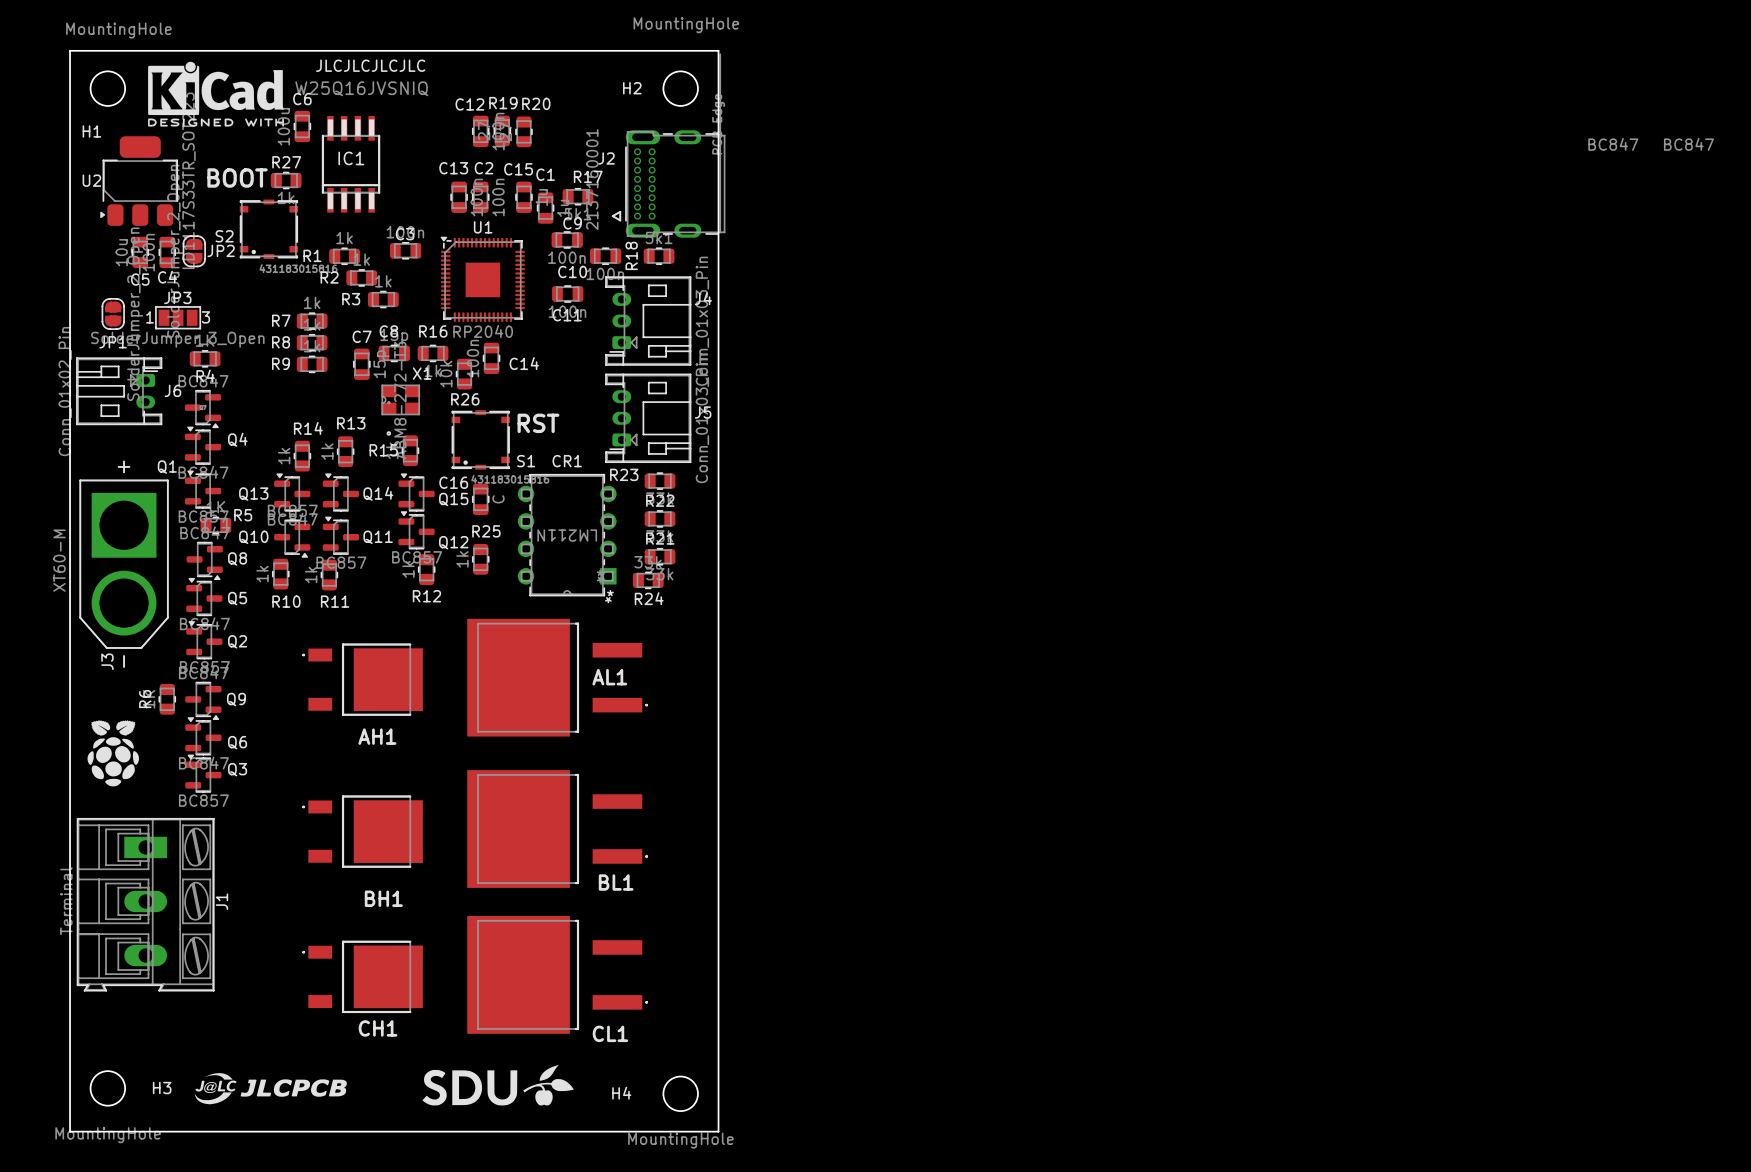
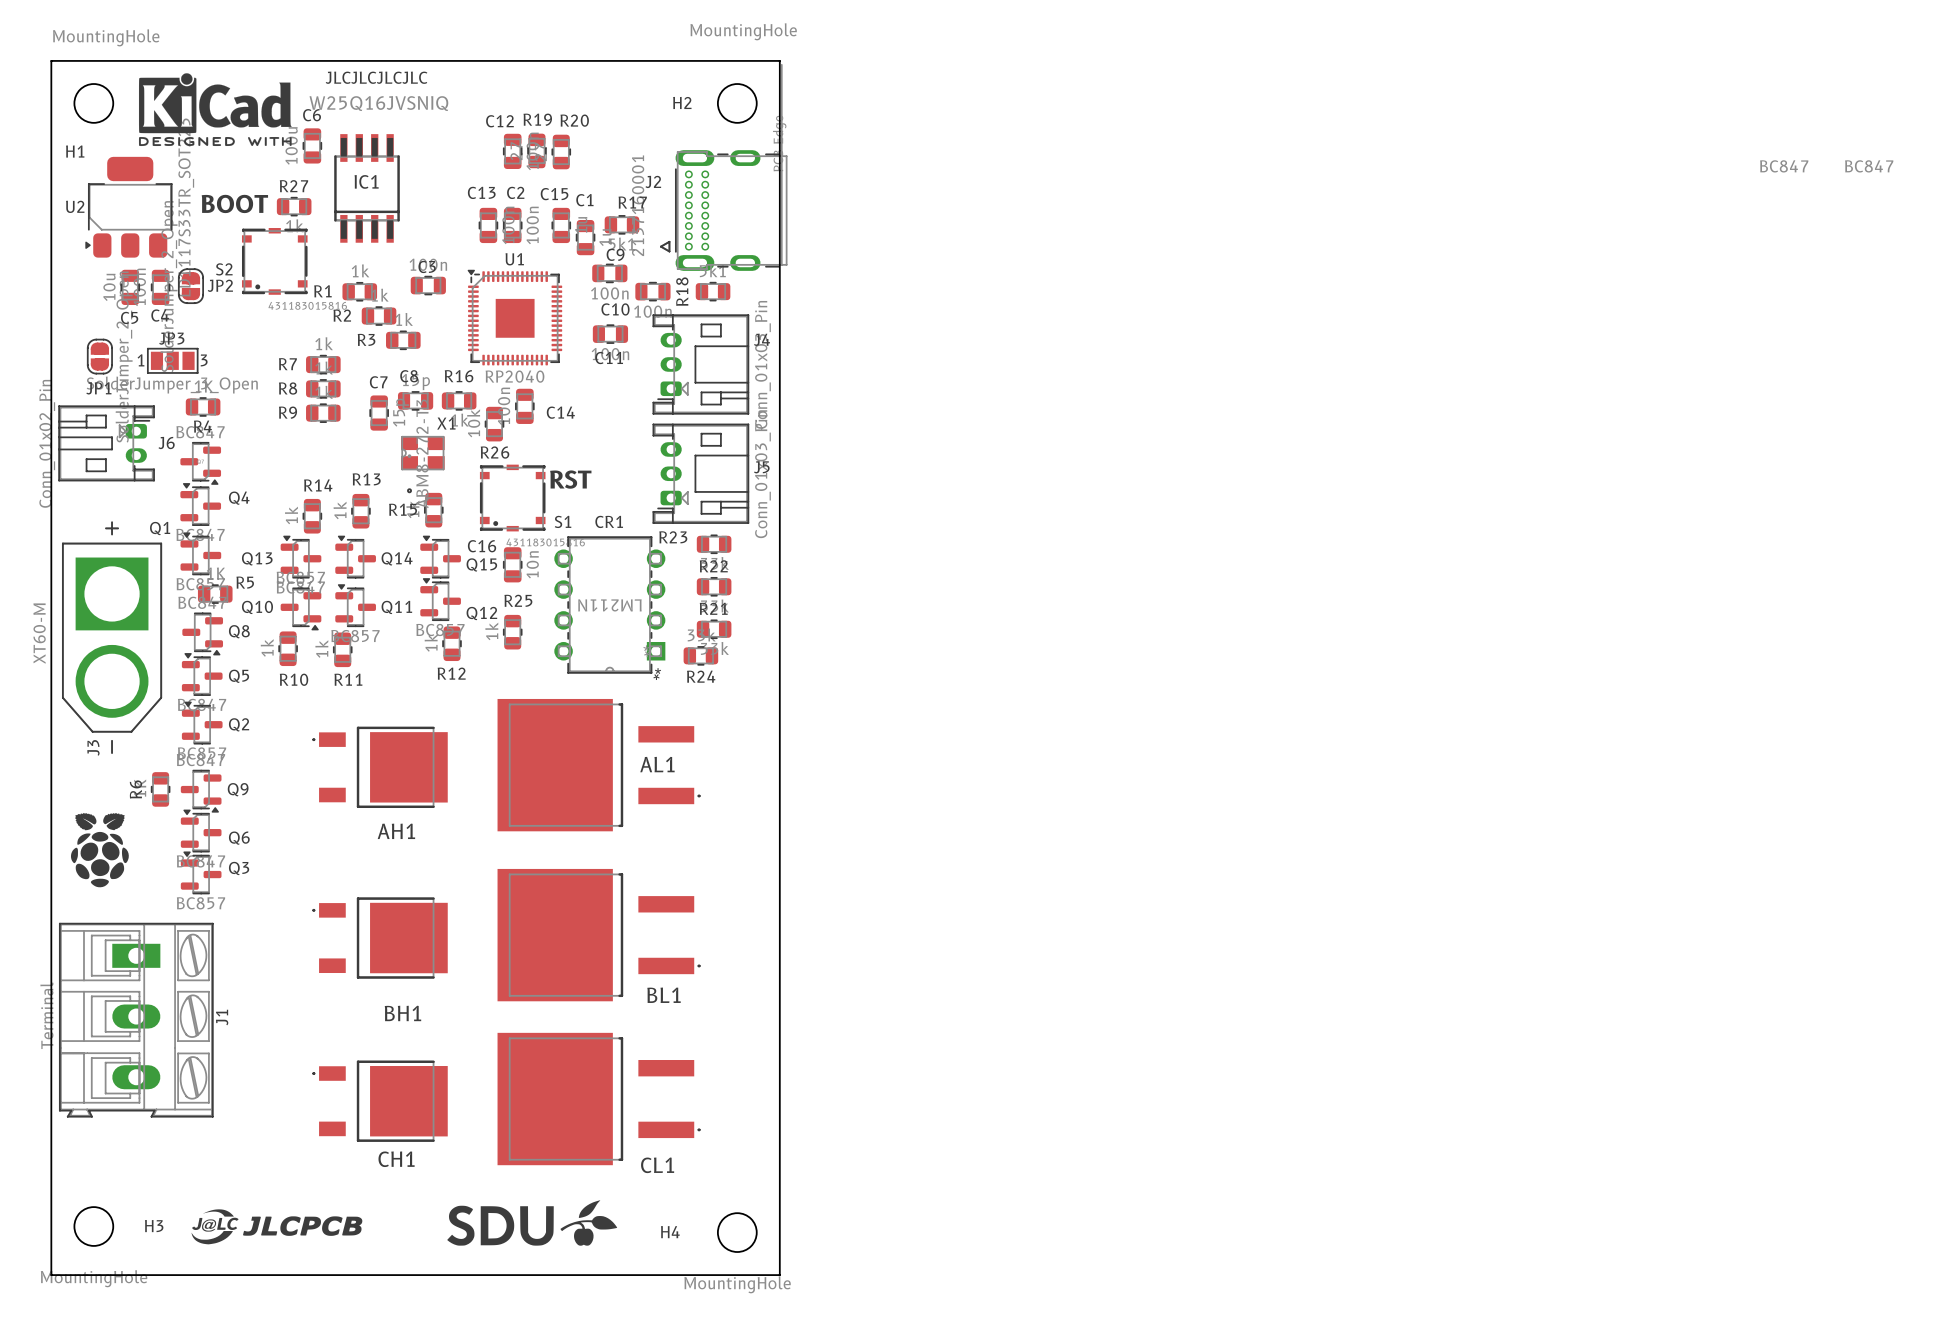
C16 value: C (498, 499) -> 10n (532, 564)

